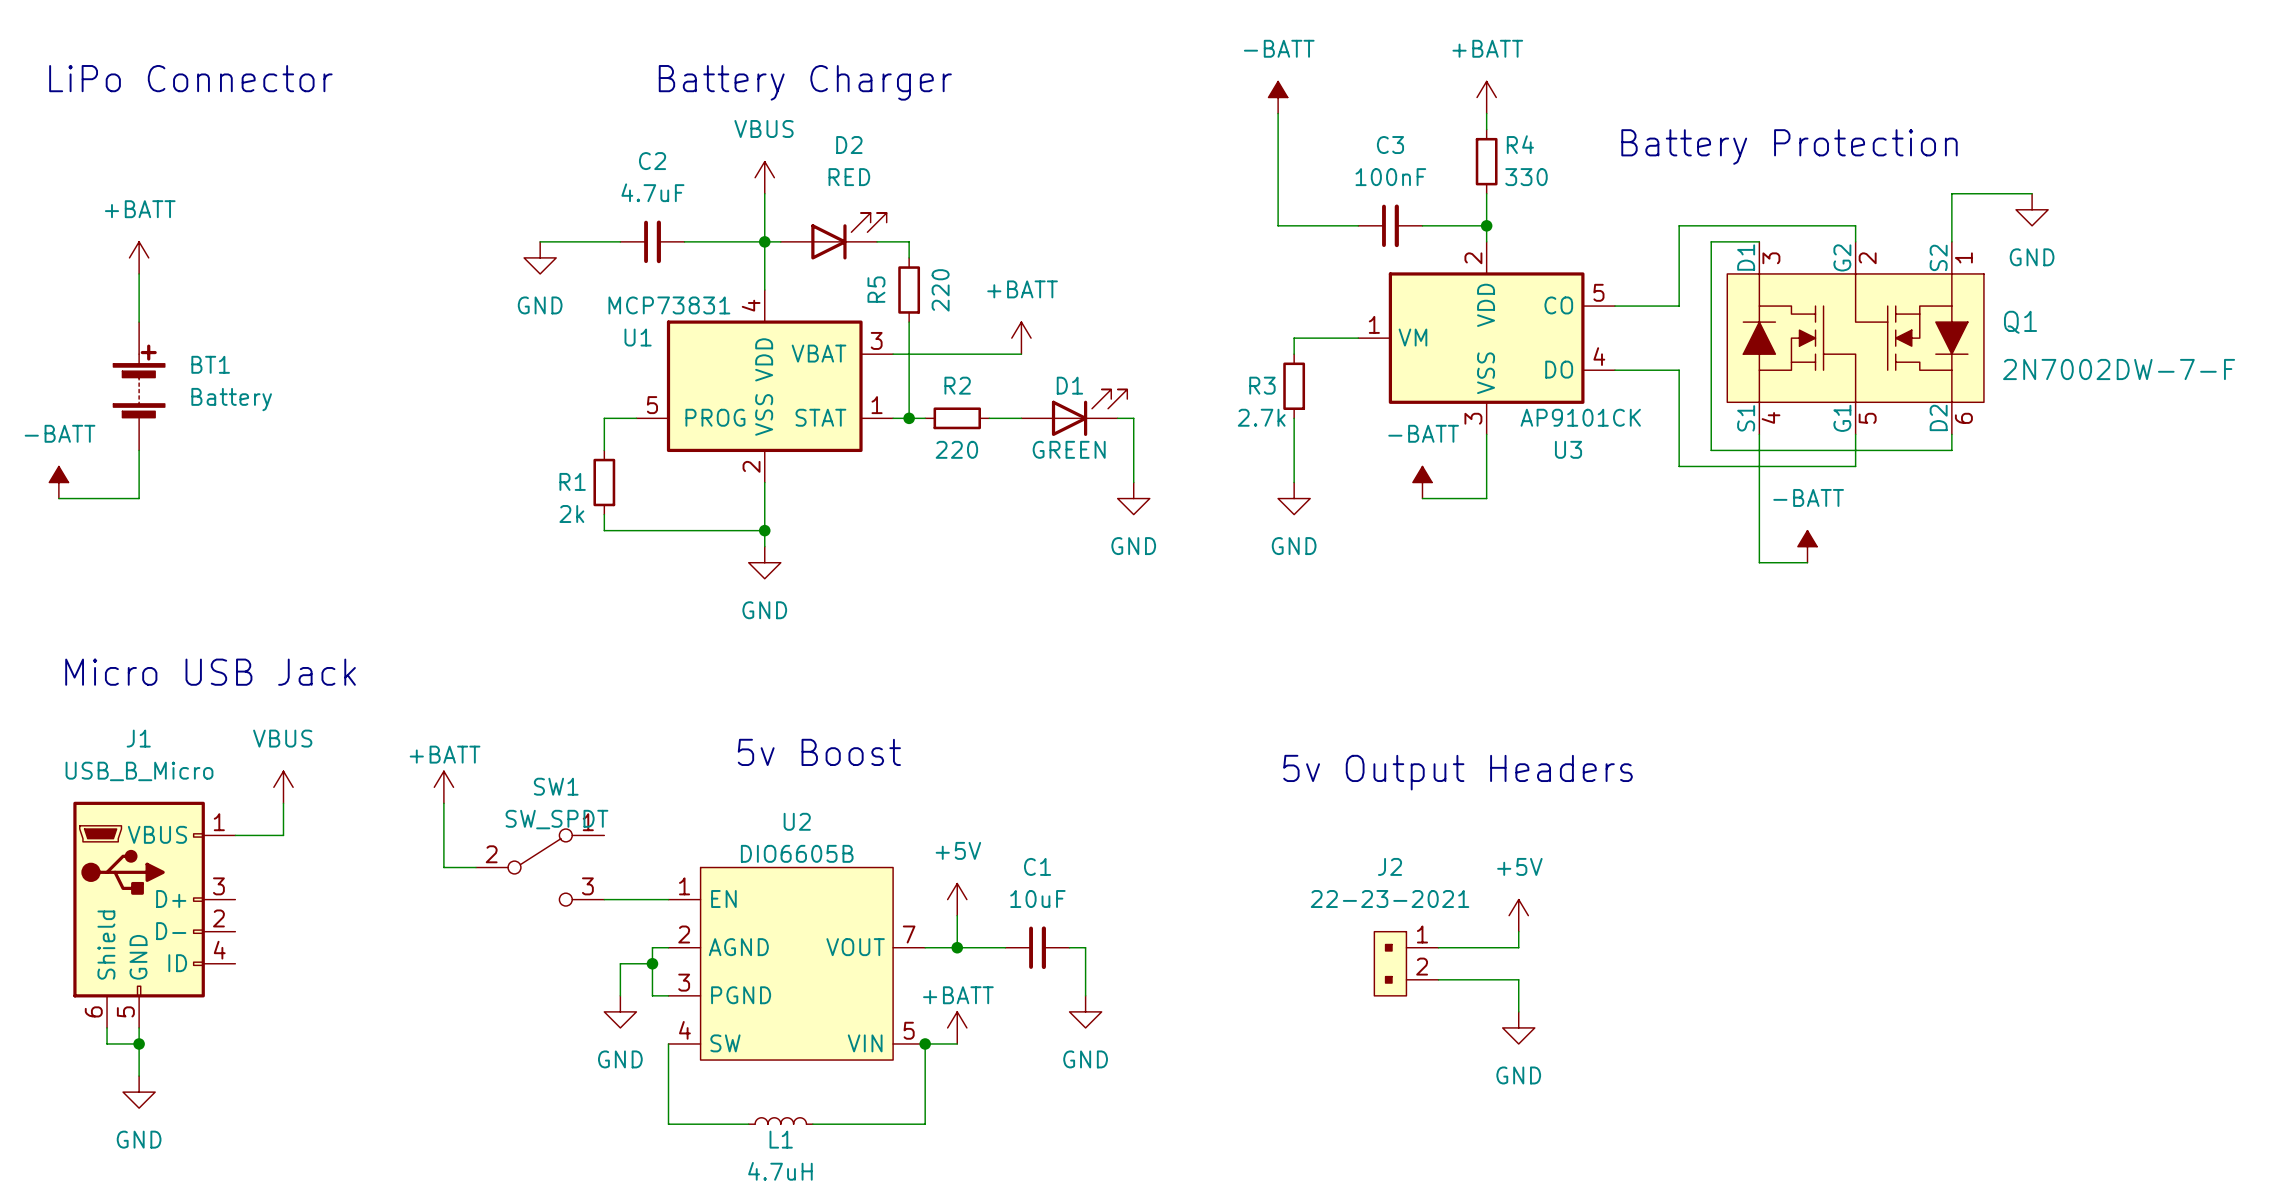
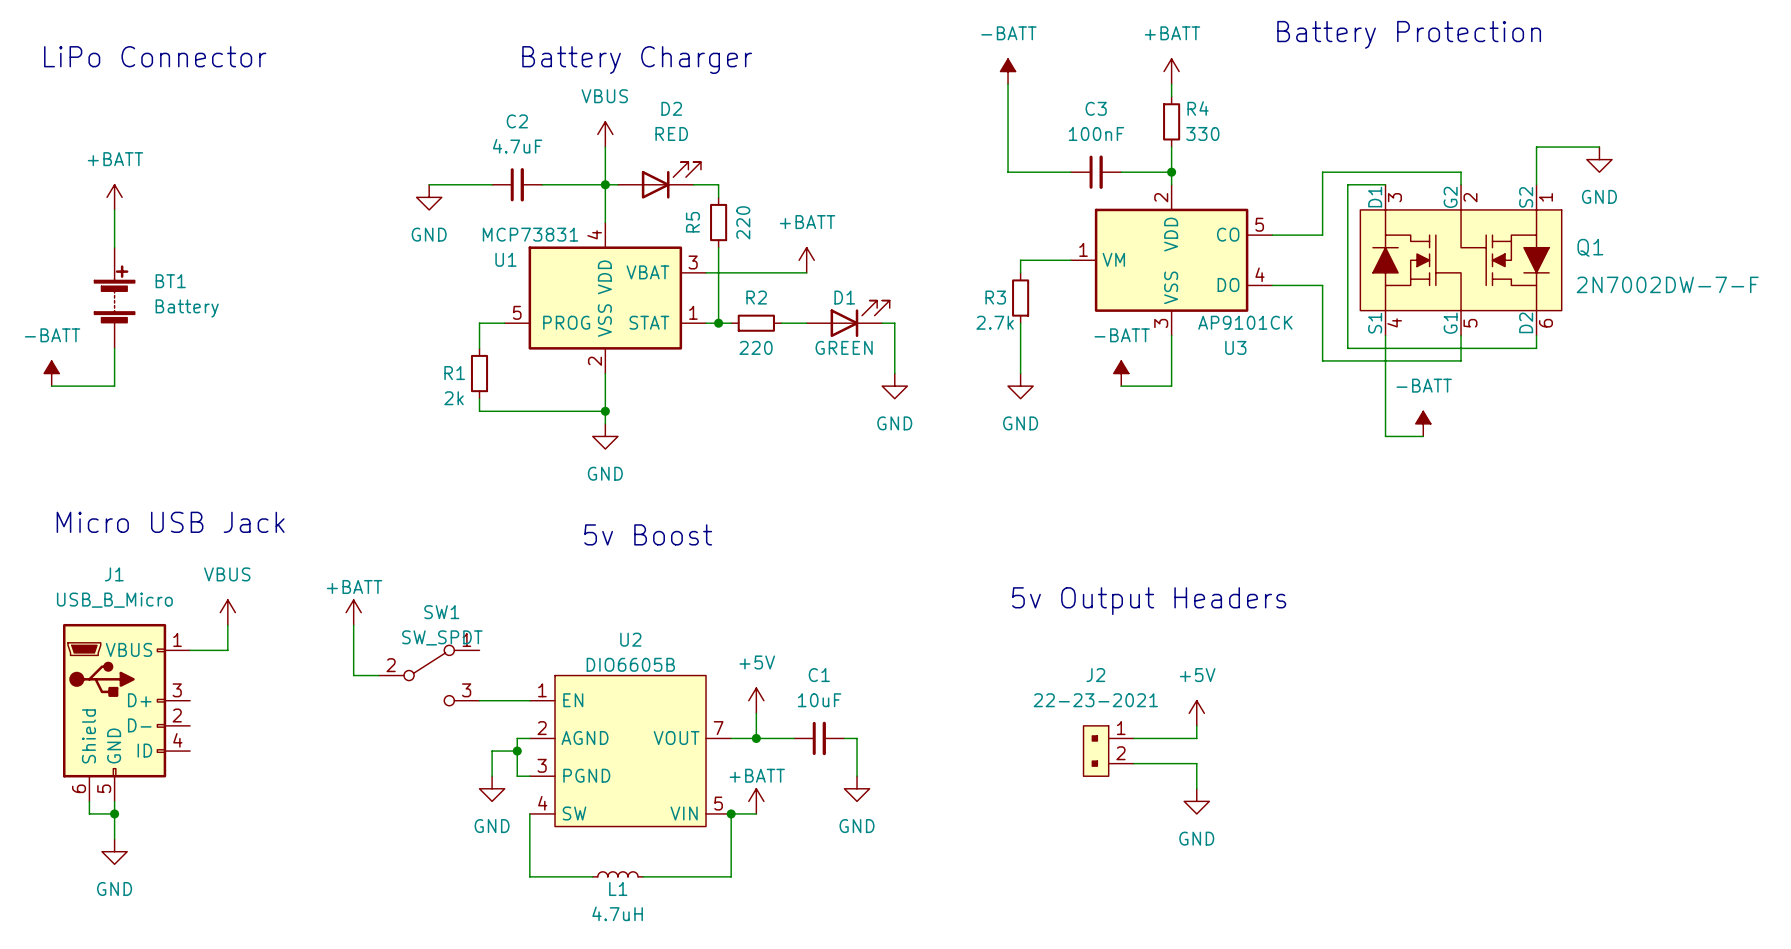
text position: Battery Protection (1789, 146) -> Battery Protection (1409, 34)
text position: 5v Boost (819, 752) -> 5v Boost (648, 534)

